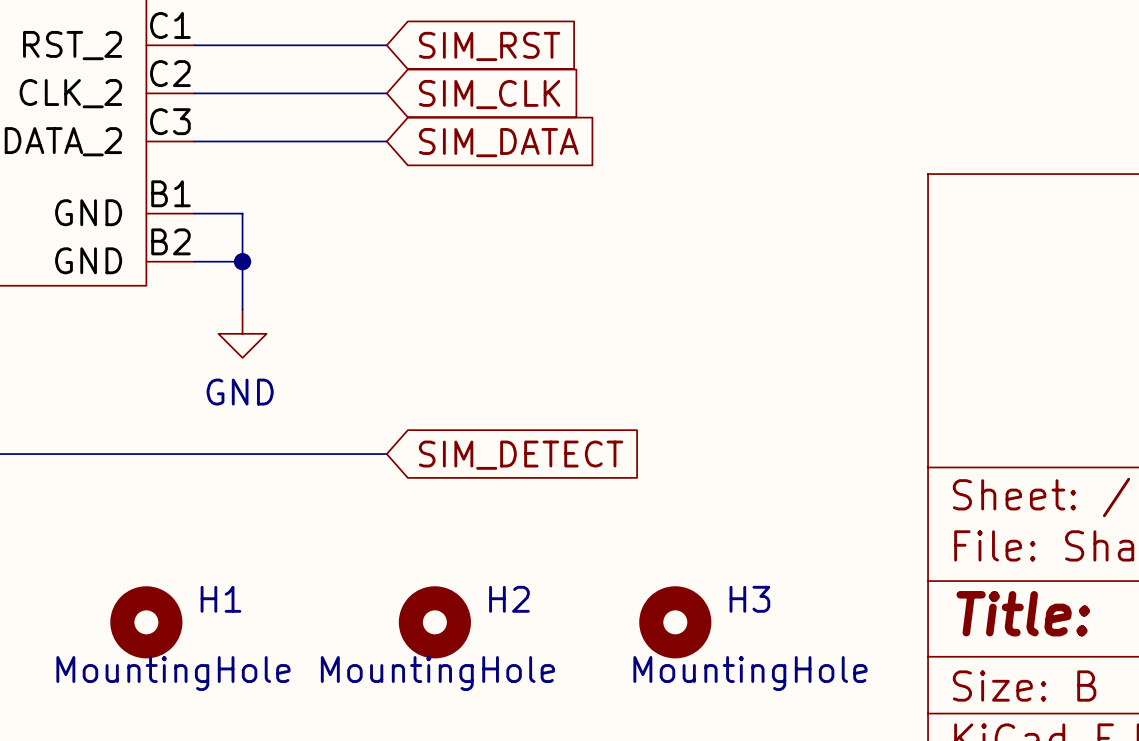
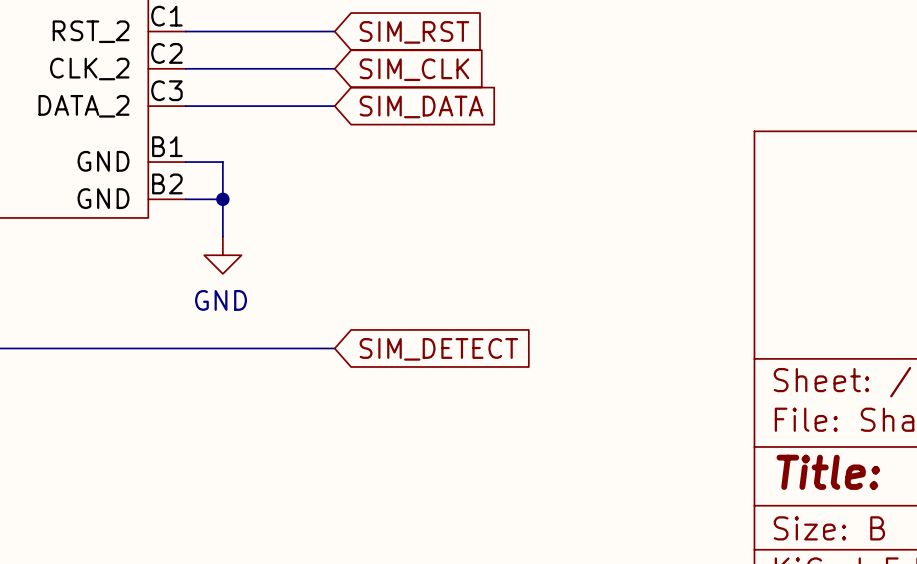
H1: MountingHole (146, 622) -> none
H2: MountingHole (434, 622) -> none
H3: MountingHole (675, 622) -> none

